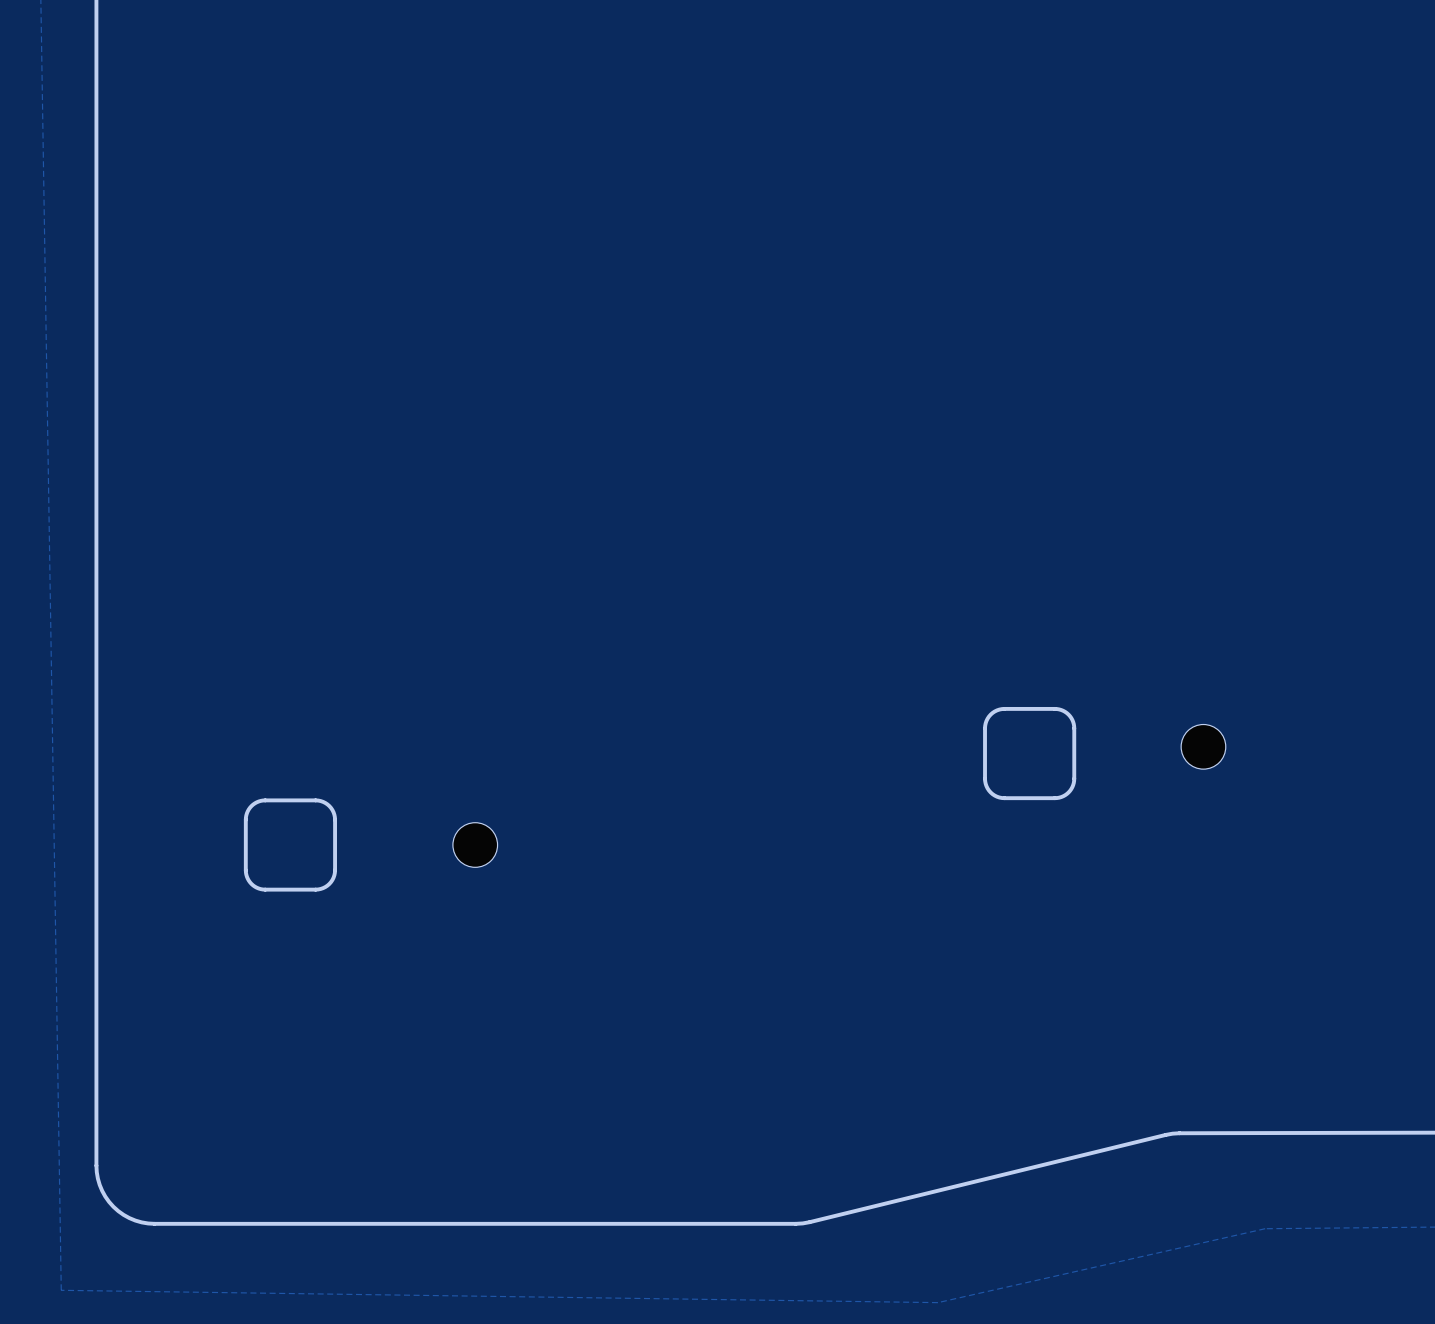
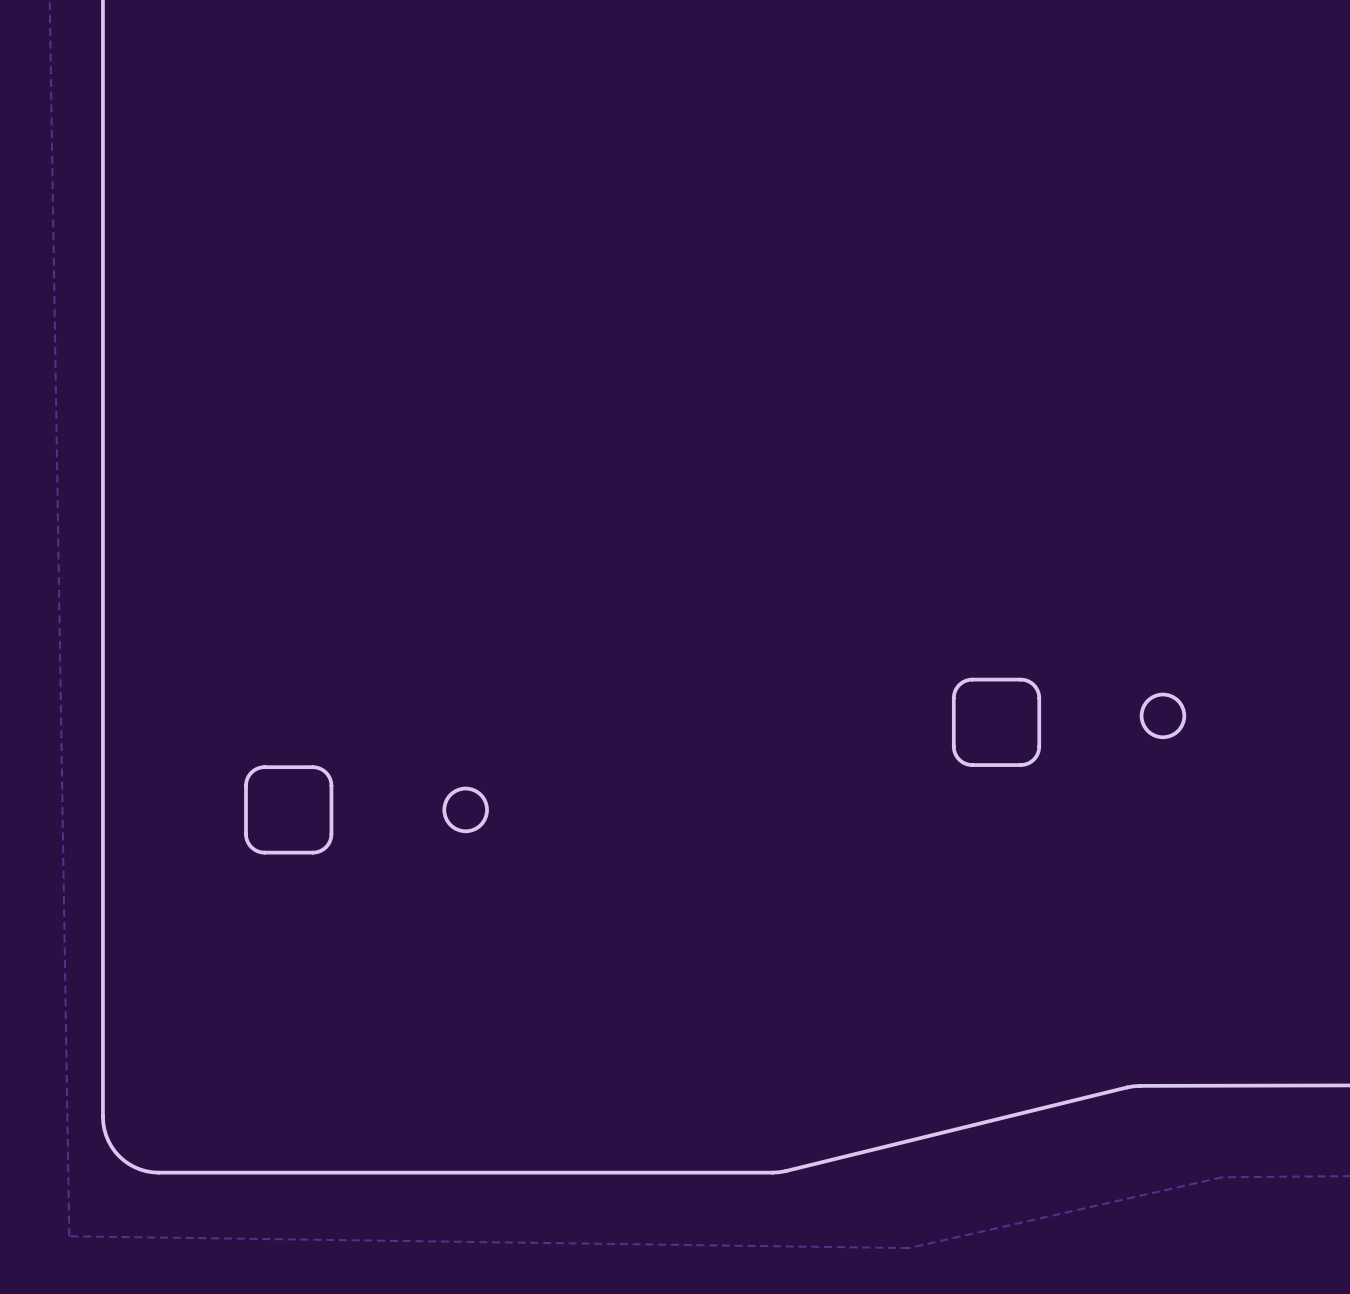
round board edge: none -> [1139, 692, 1187, 740]
part: (1203, 746) -> none
round board edge: none -> [442, 786, 489, 834]
part: (475, 845) -> none

